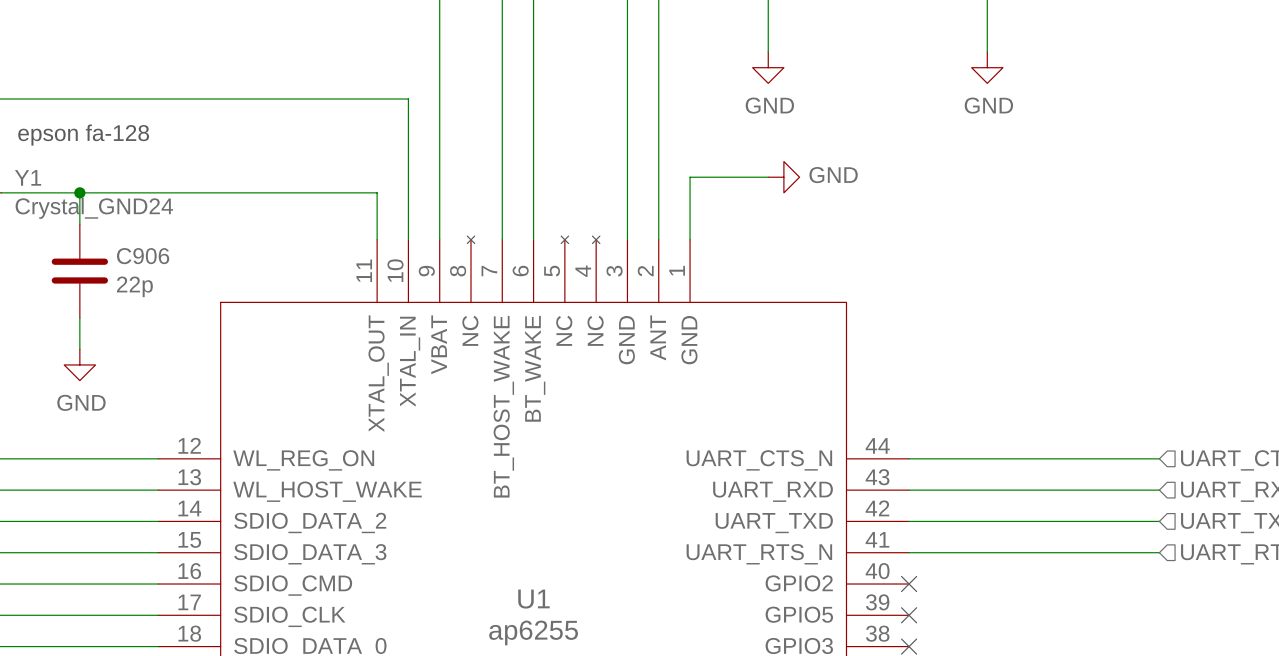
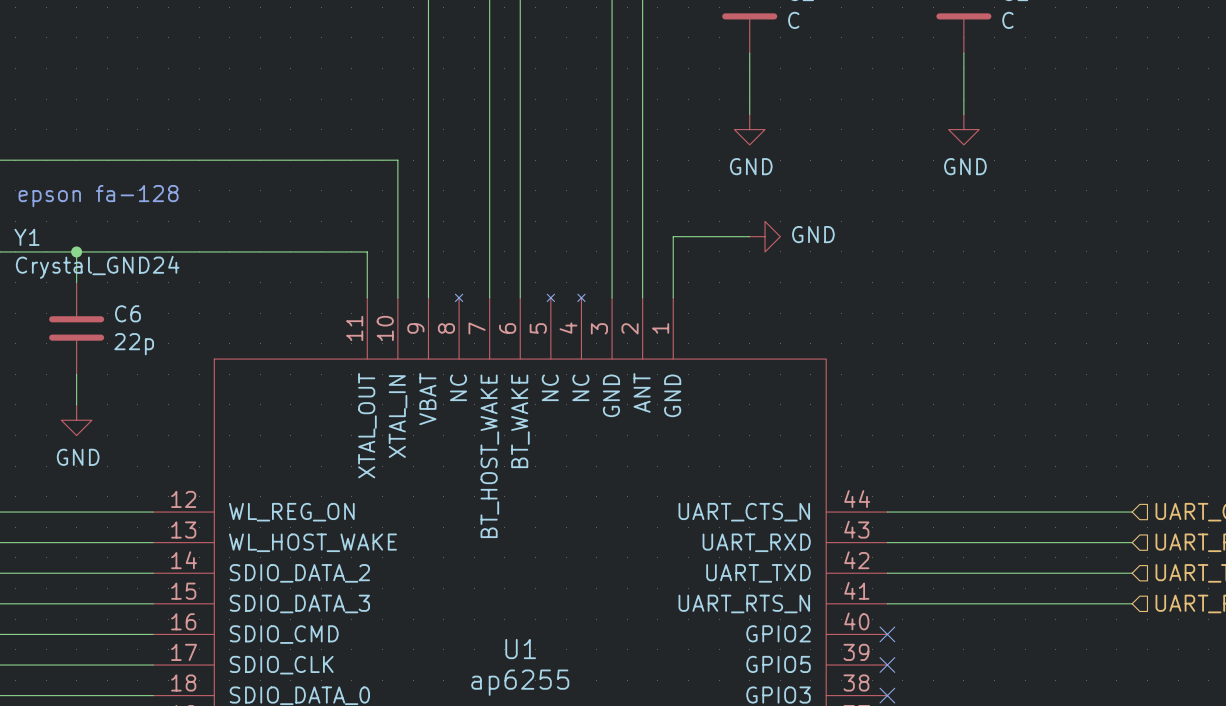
C906 name: C906 (143, 256) -> C6 (127, 313)

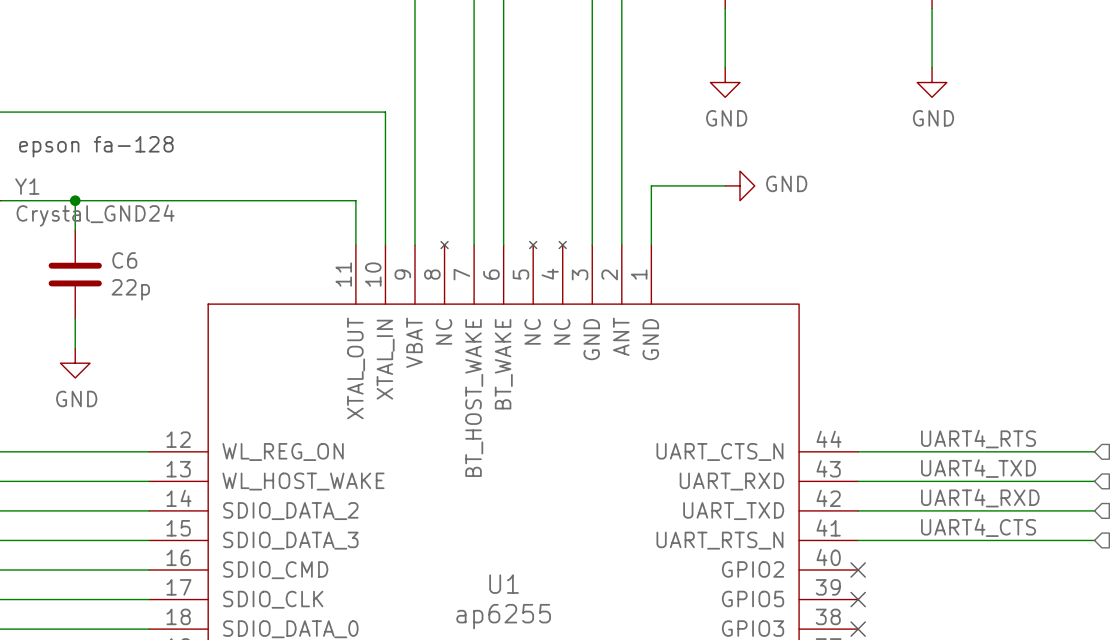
label: none -> UART4_RTS (978, 439)
label: none -> UART4_TXD (978, 468)
label: none -> UART4_RXD (980, 498)
label: none -> UART4_CTS (978, 527)

